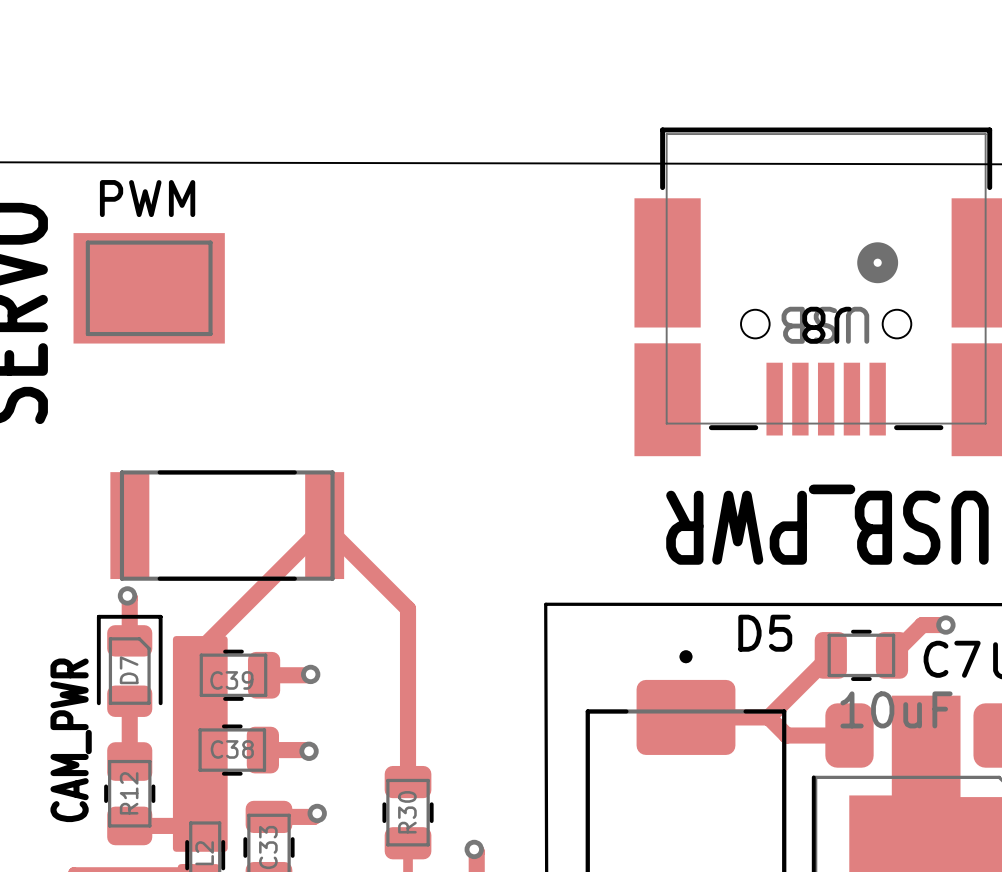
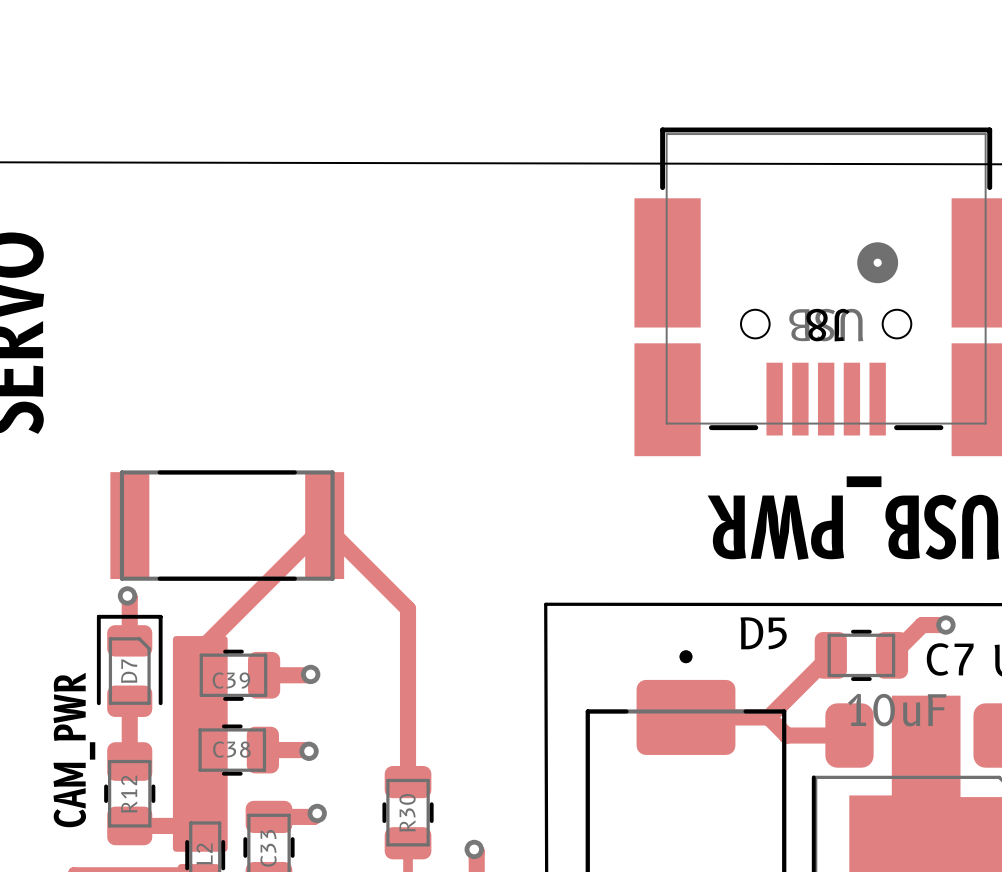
PWM: (149, 288) -> none

